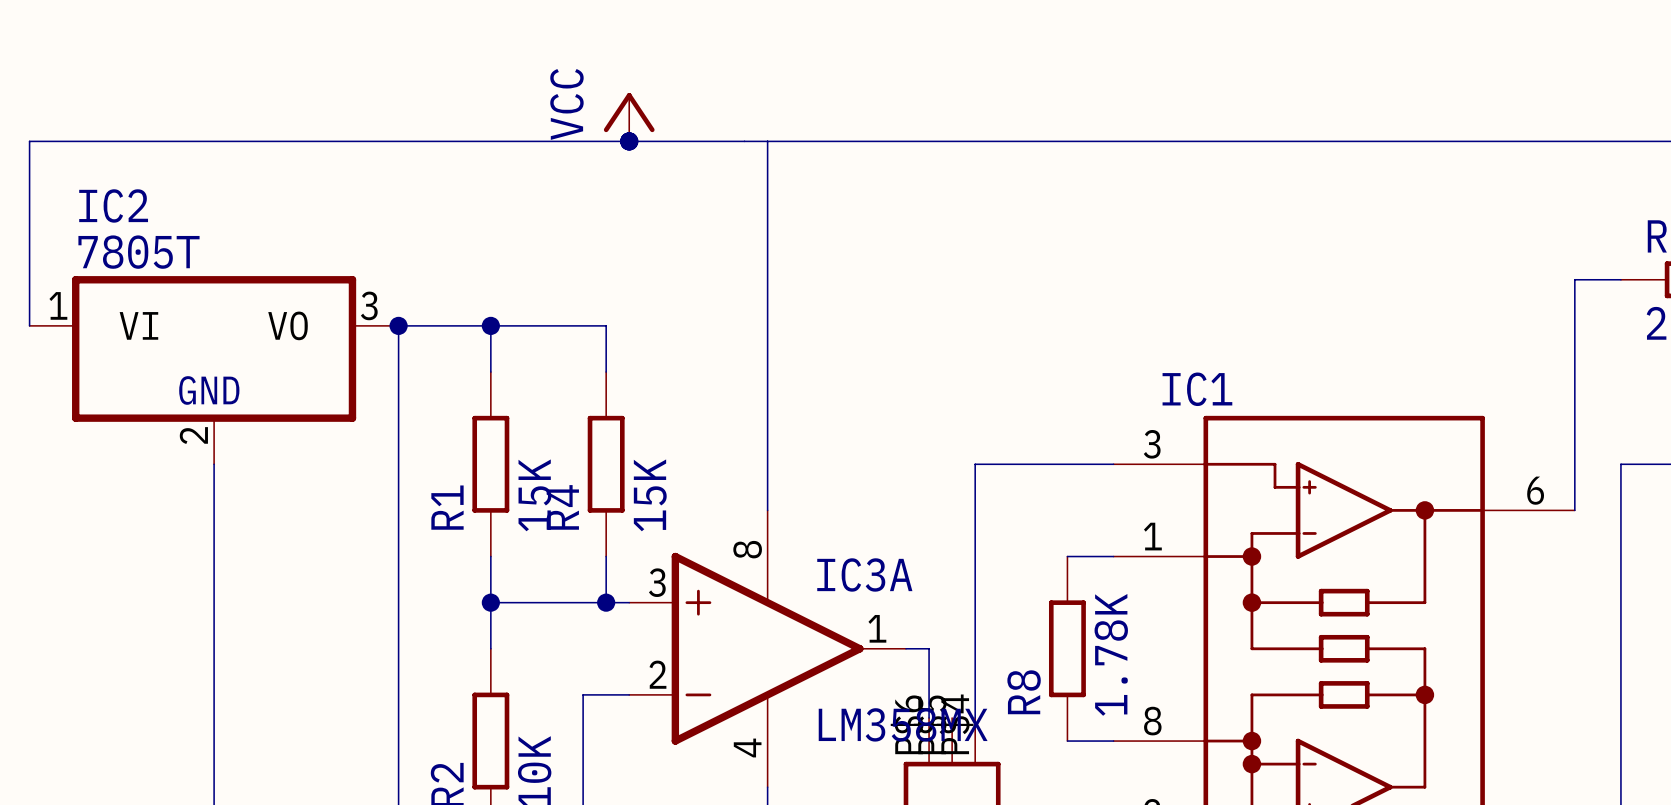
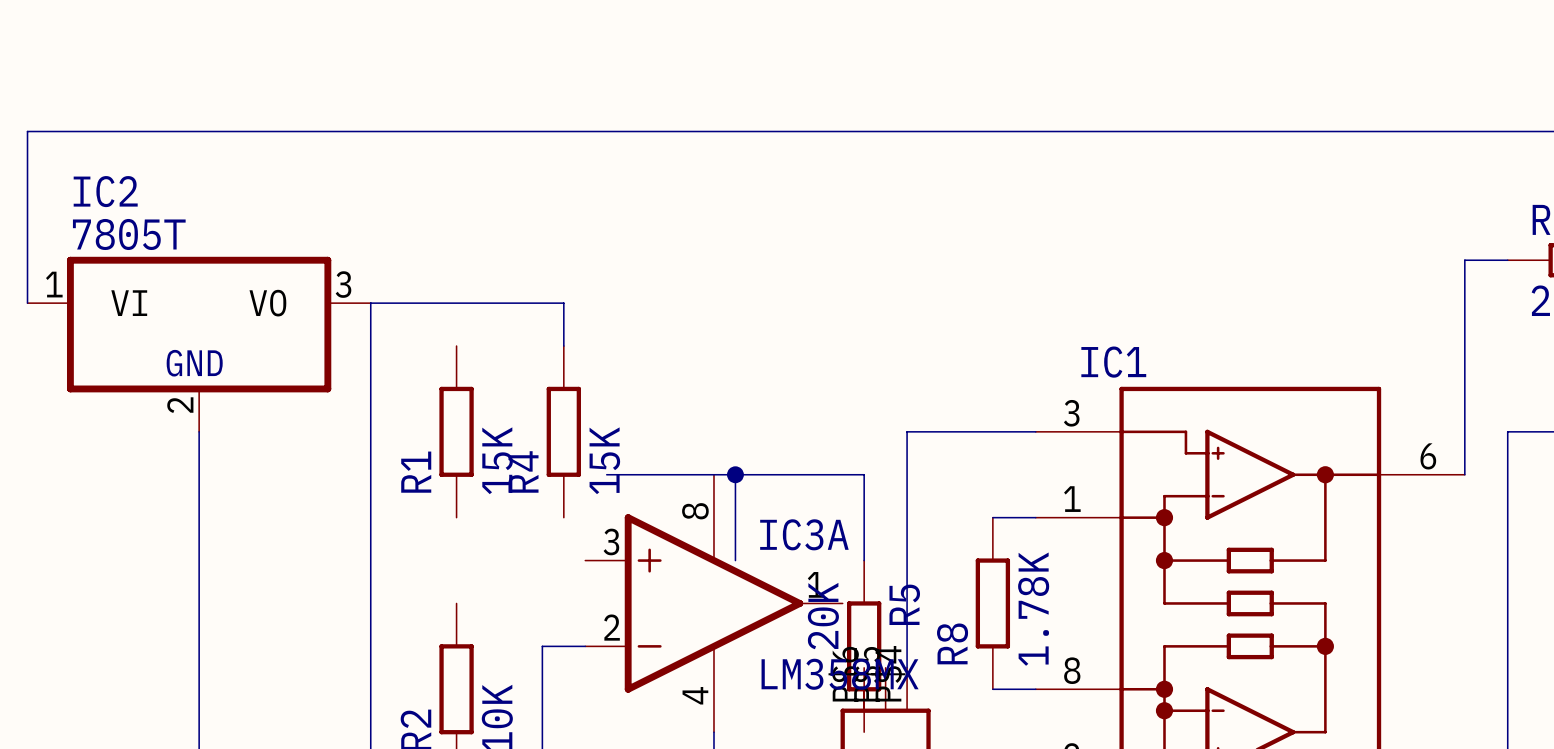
power symbol: VCC (629, 117) -> none
junction: (629, 141) -> none
wire: (767, 141) (767, 510) -> none
junction: (398, 325) -> none
wire: (490, 325) (490, 372) -> none
junction: (490, 325) -> none
wire: none -> (606, 474) (864, 474) (864, 560)
junction: none -> (735, 474)
wire: (490, 556) (490, 648) -> (735, 474) (735, 560)
wire: (606, 556) (606, 602) -> none
wire: (490, 602) (629, 602) -> none
junction: (490, 602) -> none
junction: (606, 602) -> none
wire: (905, 648) (929, 648) (929, 717) -> none
R5: none -> 20K (864, 646)

